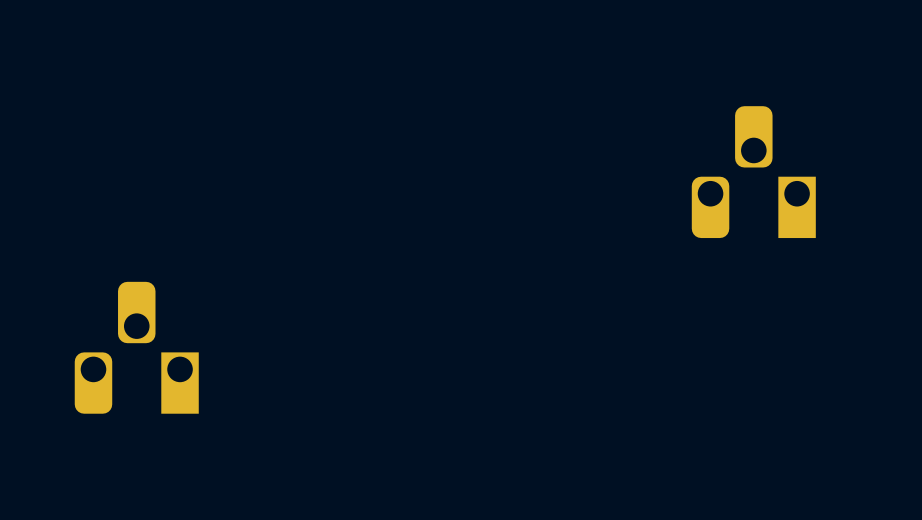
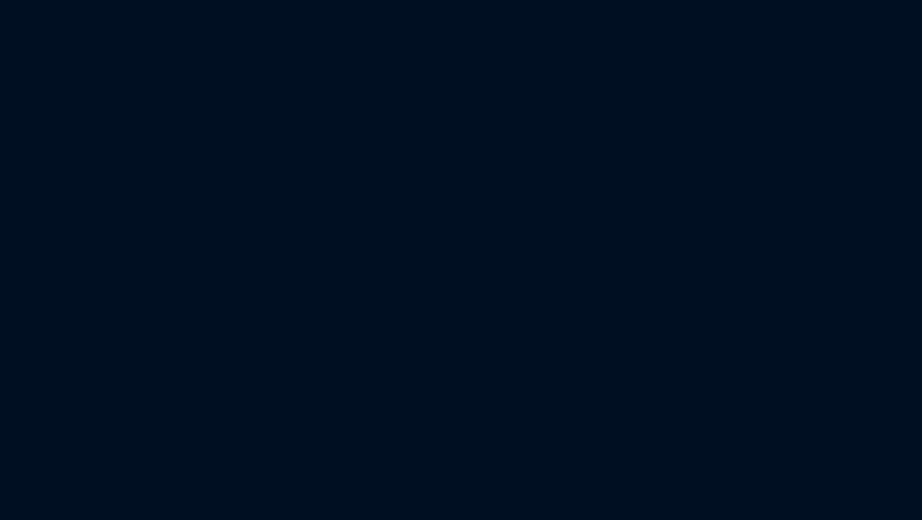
part: (753, 172) -> none
part: (136, 347) -> none

